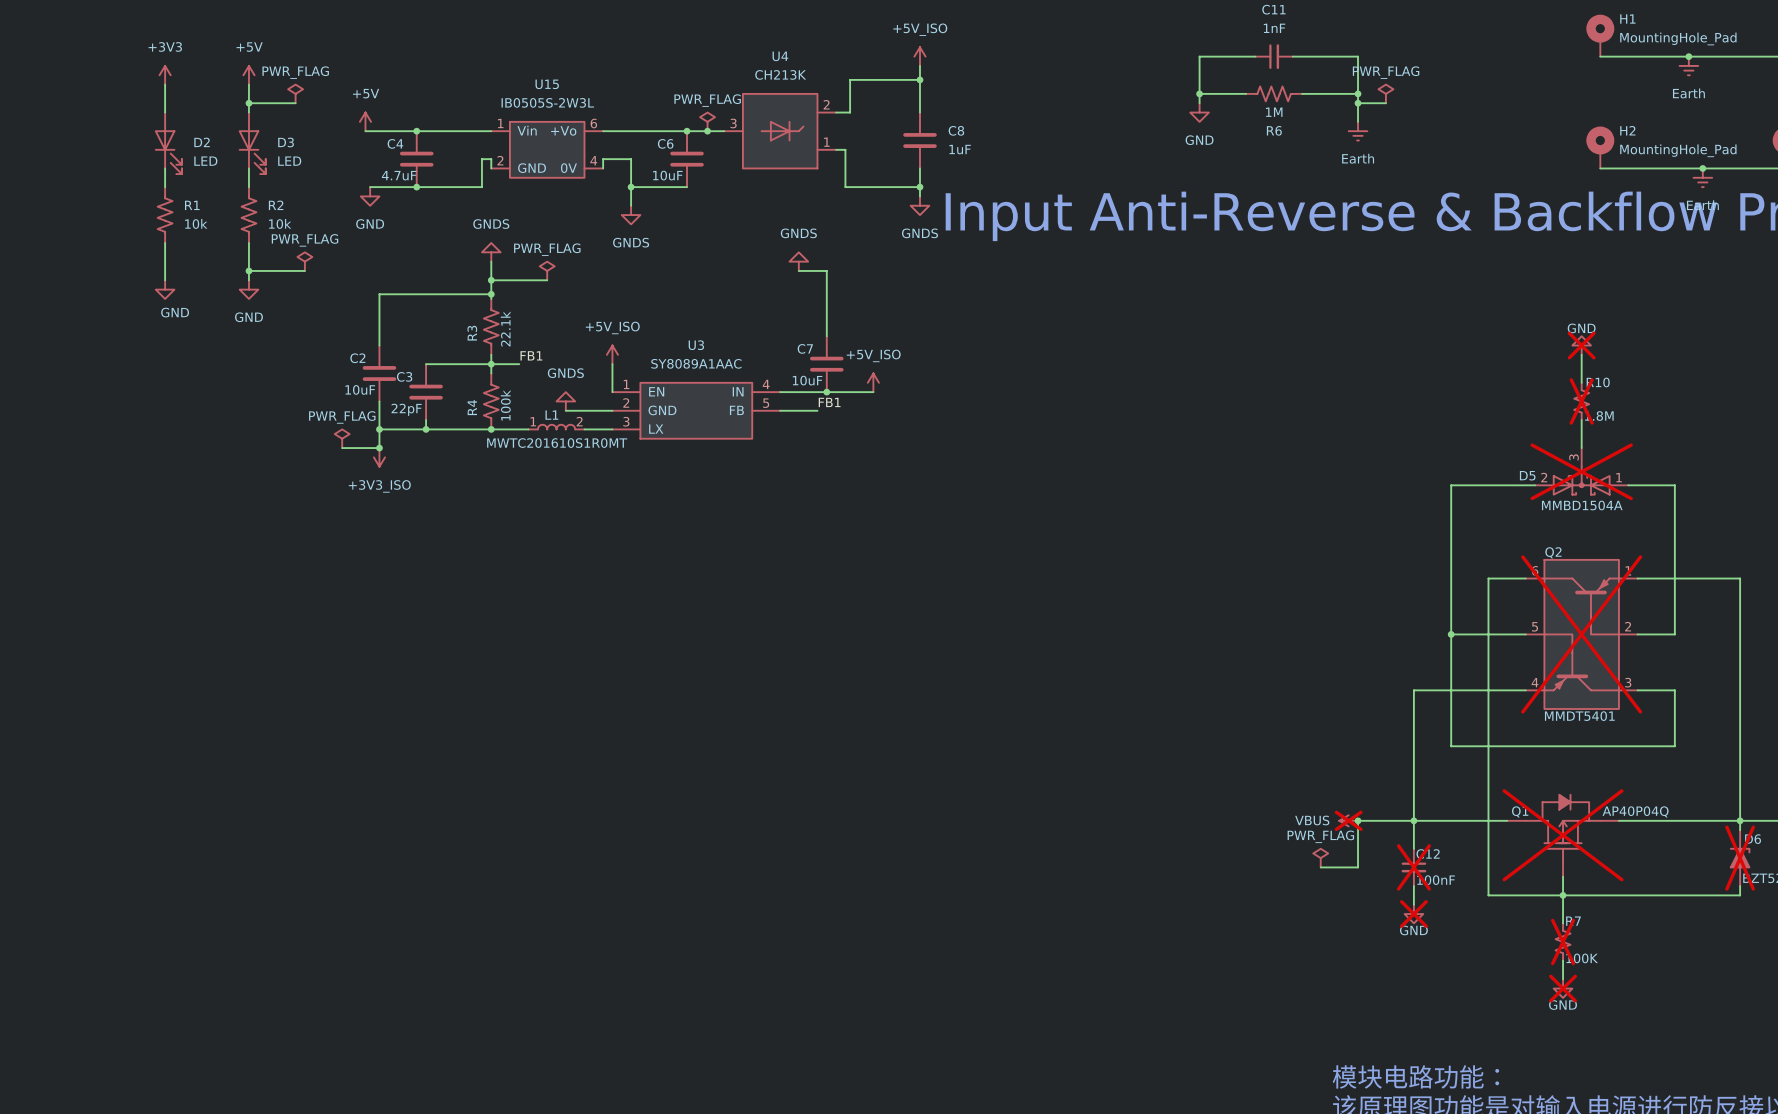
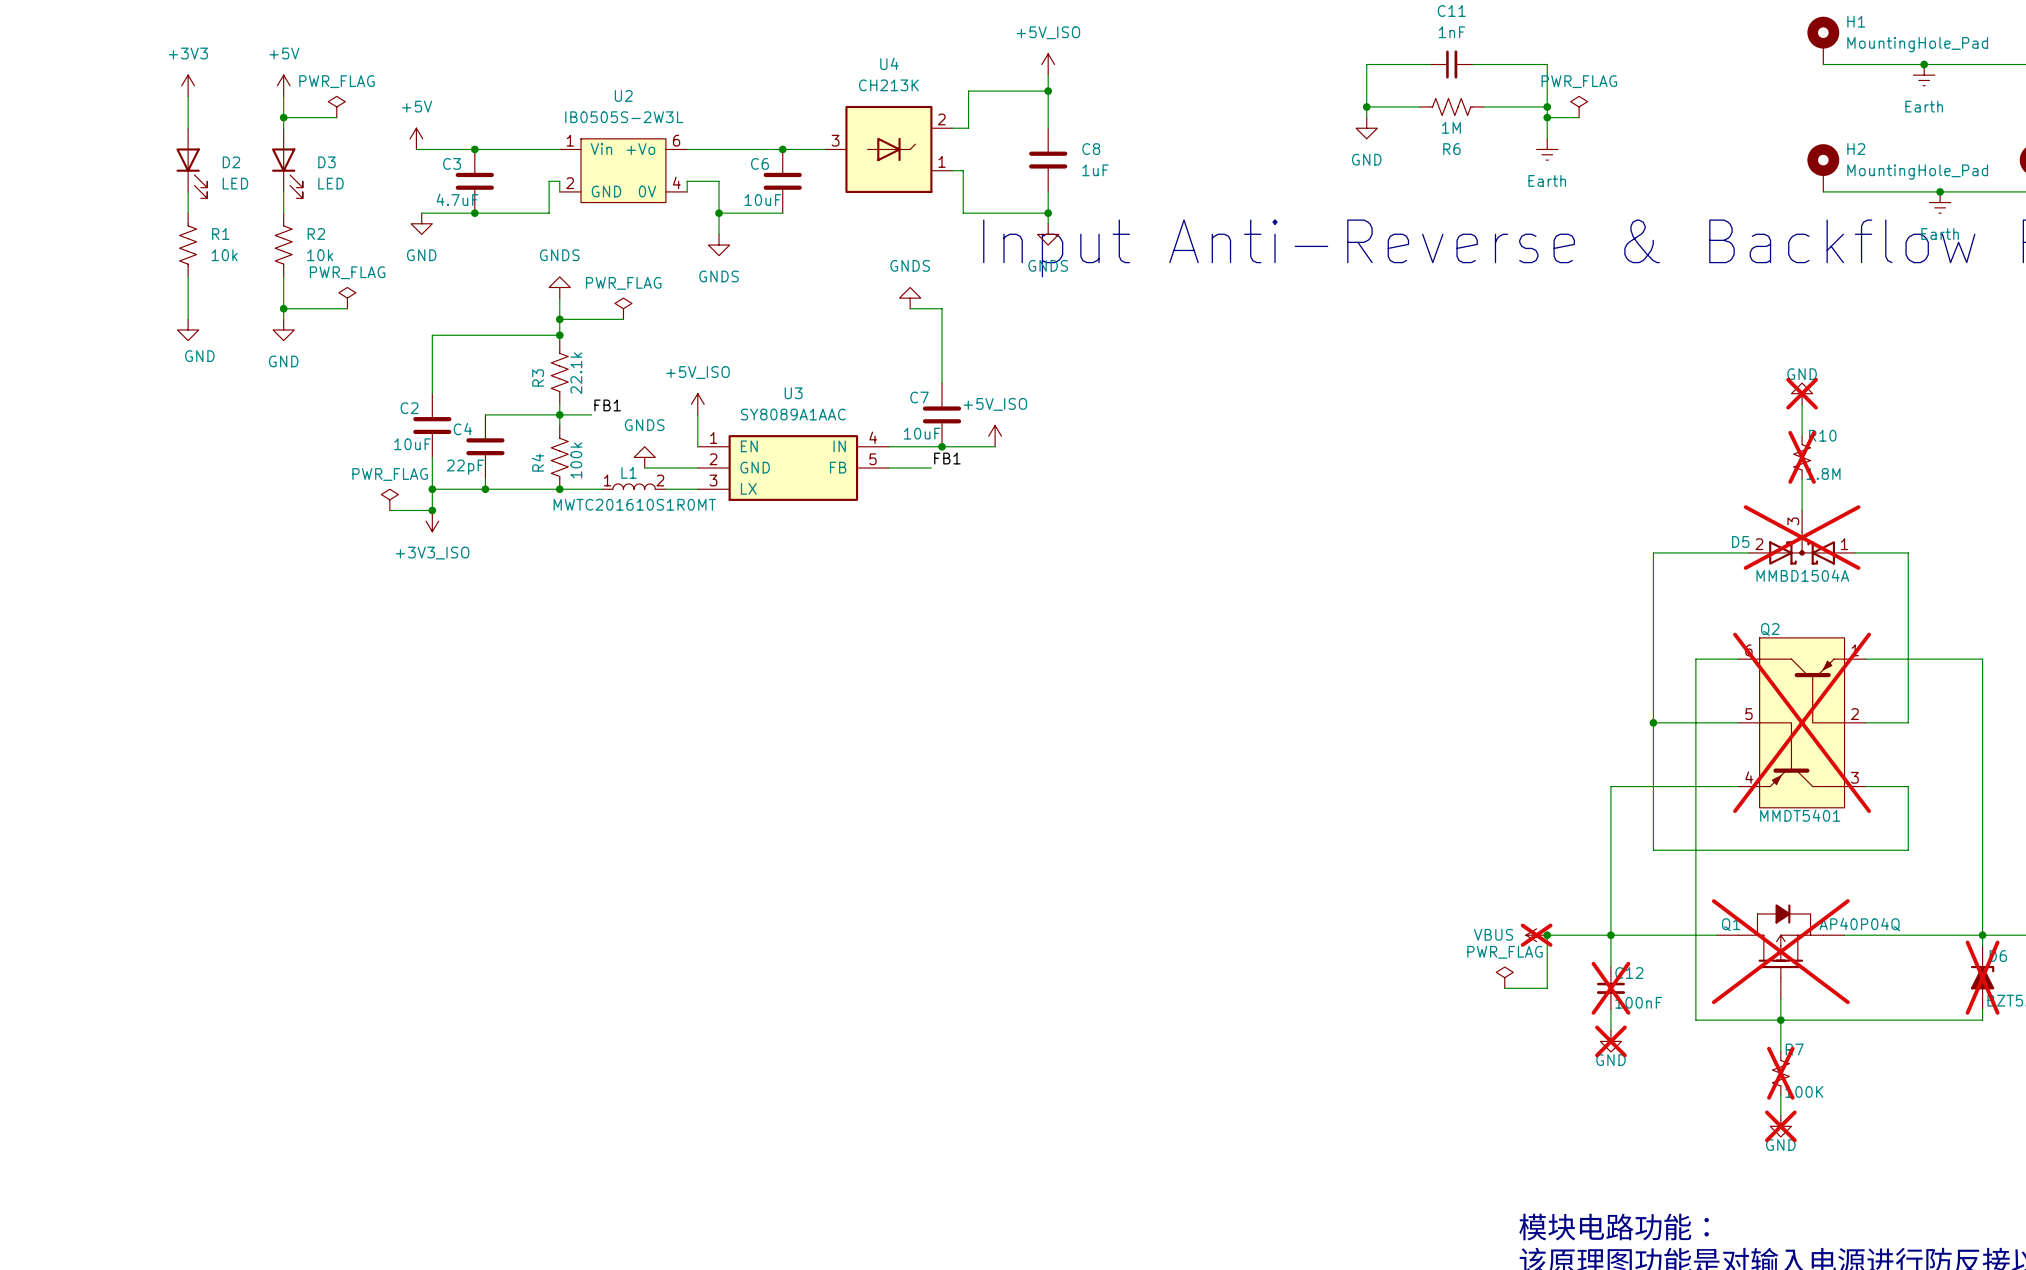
U15 name: U15 (547, 84) -> U2 (623, 95)
power symbol: PWR_FLAG (707, 121) -> none
junction: (707, 131) -> none
C4 name: C4 (395, 143) -> C3 (452, 163)
C3 name: C3 (404, 376) -> C4 (462, 429)

